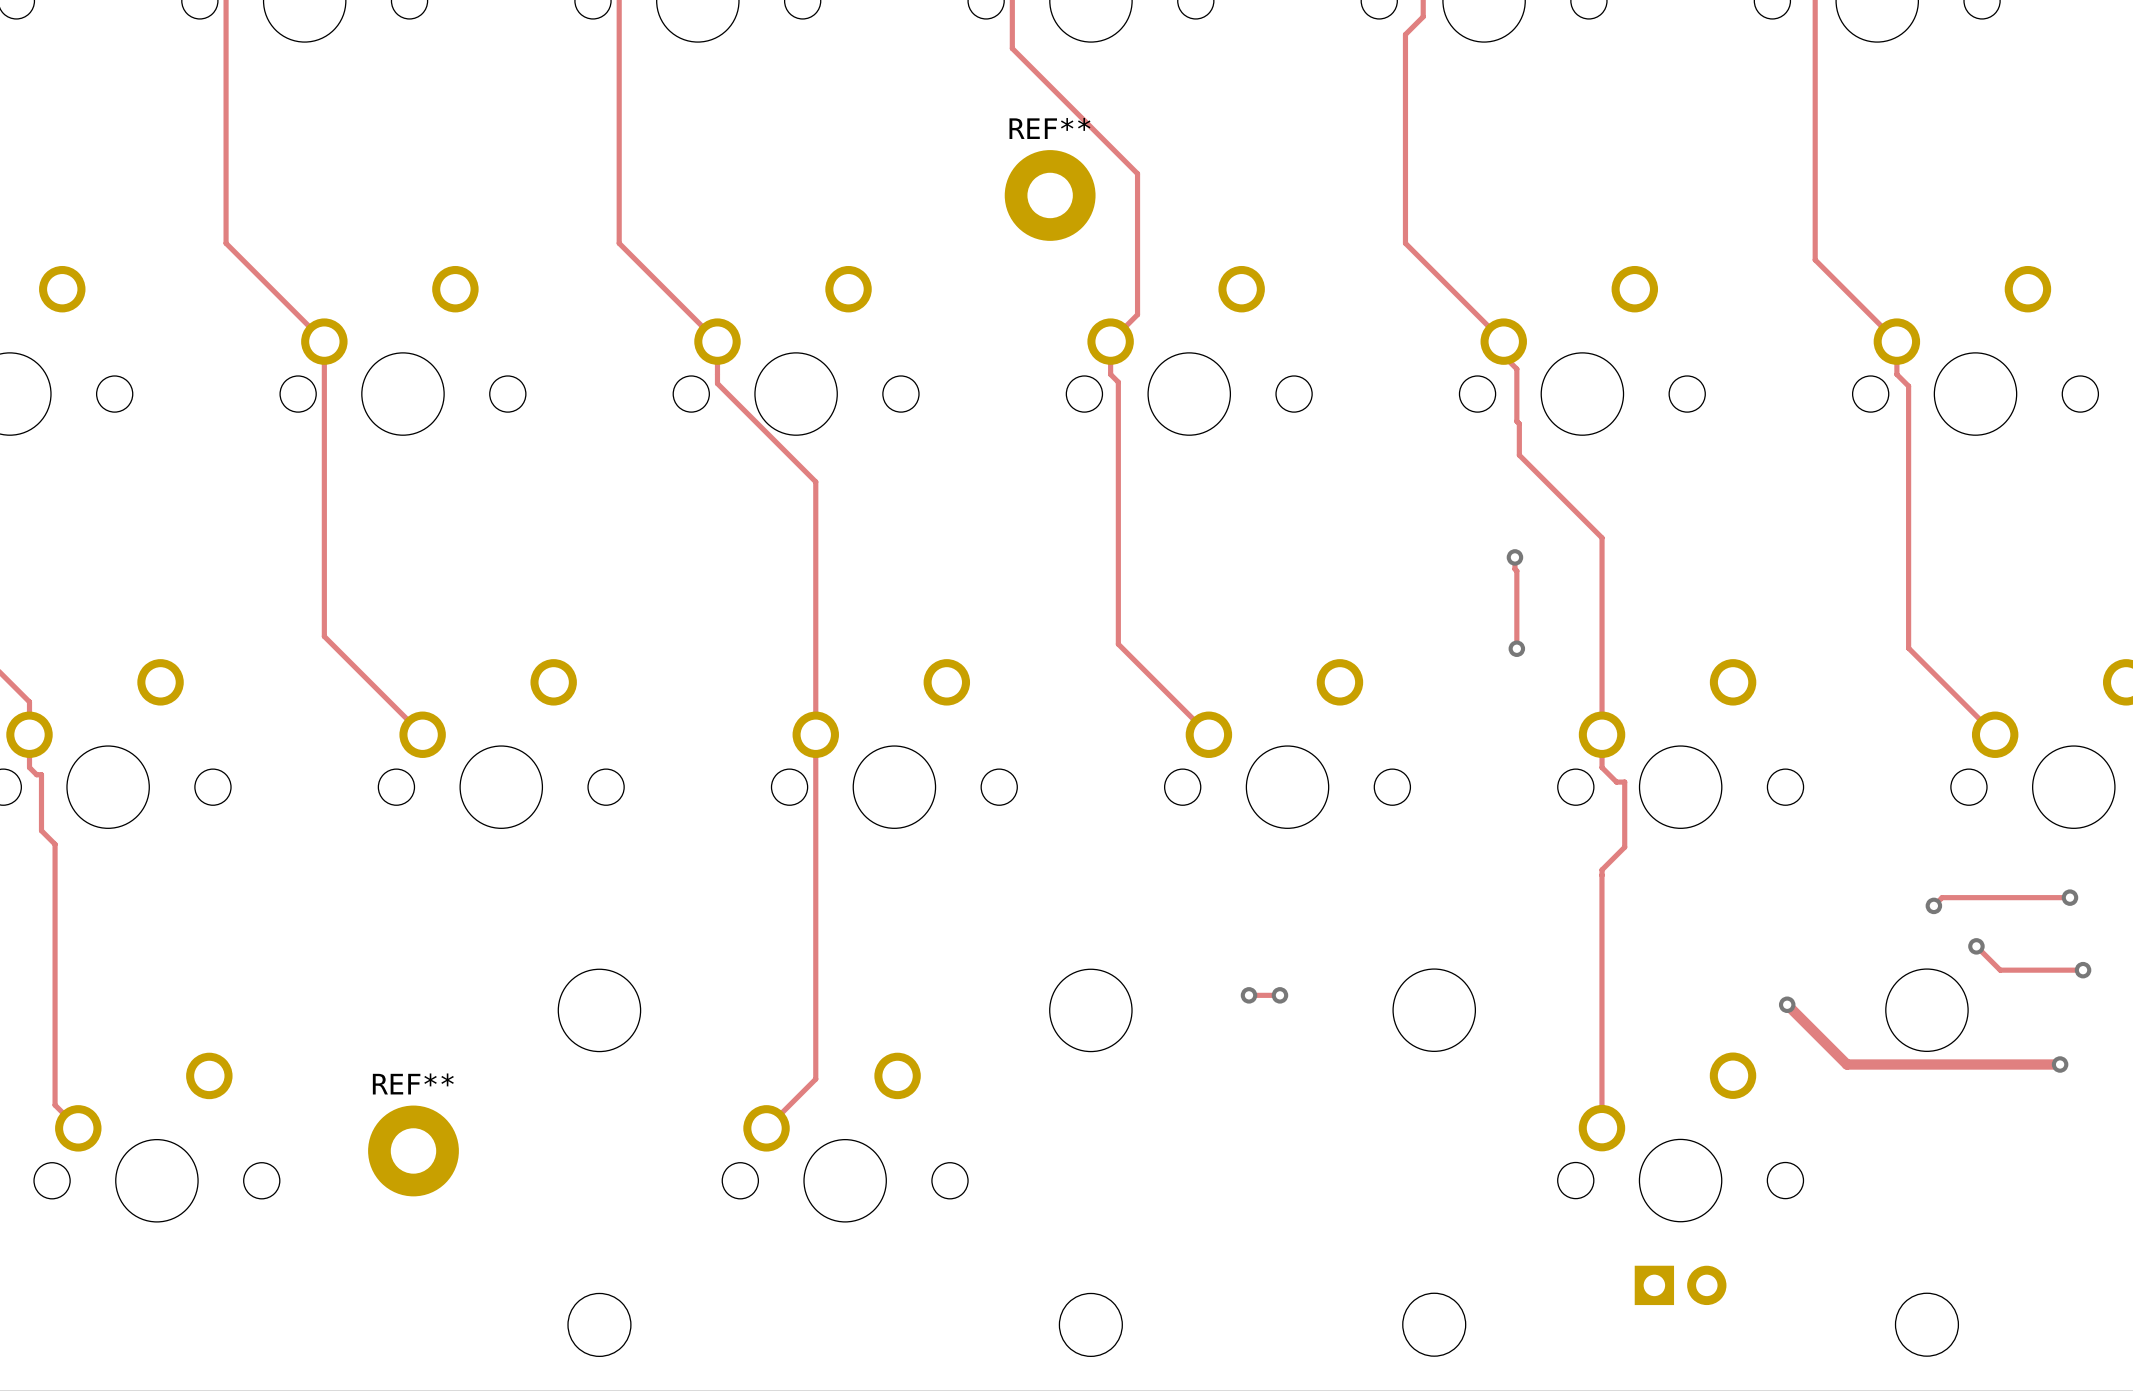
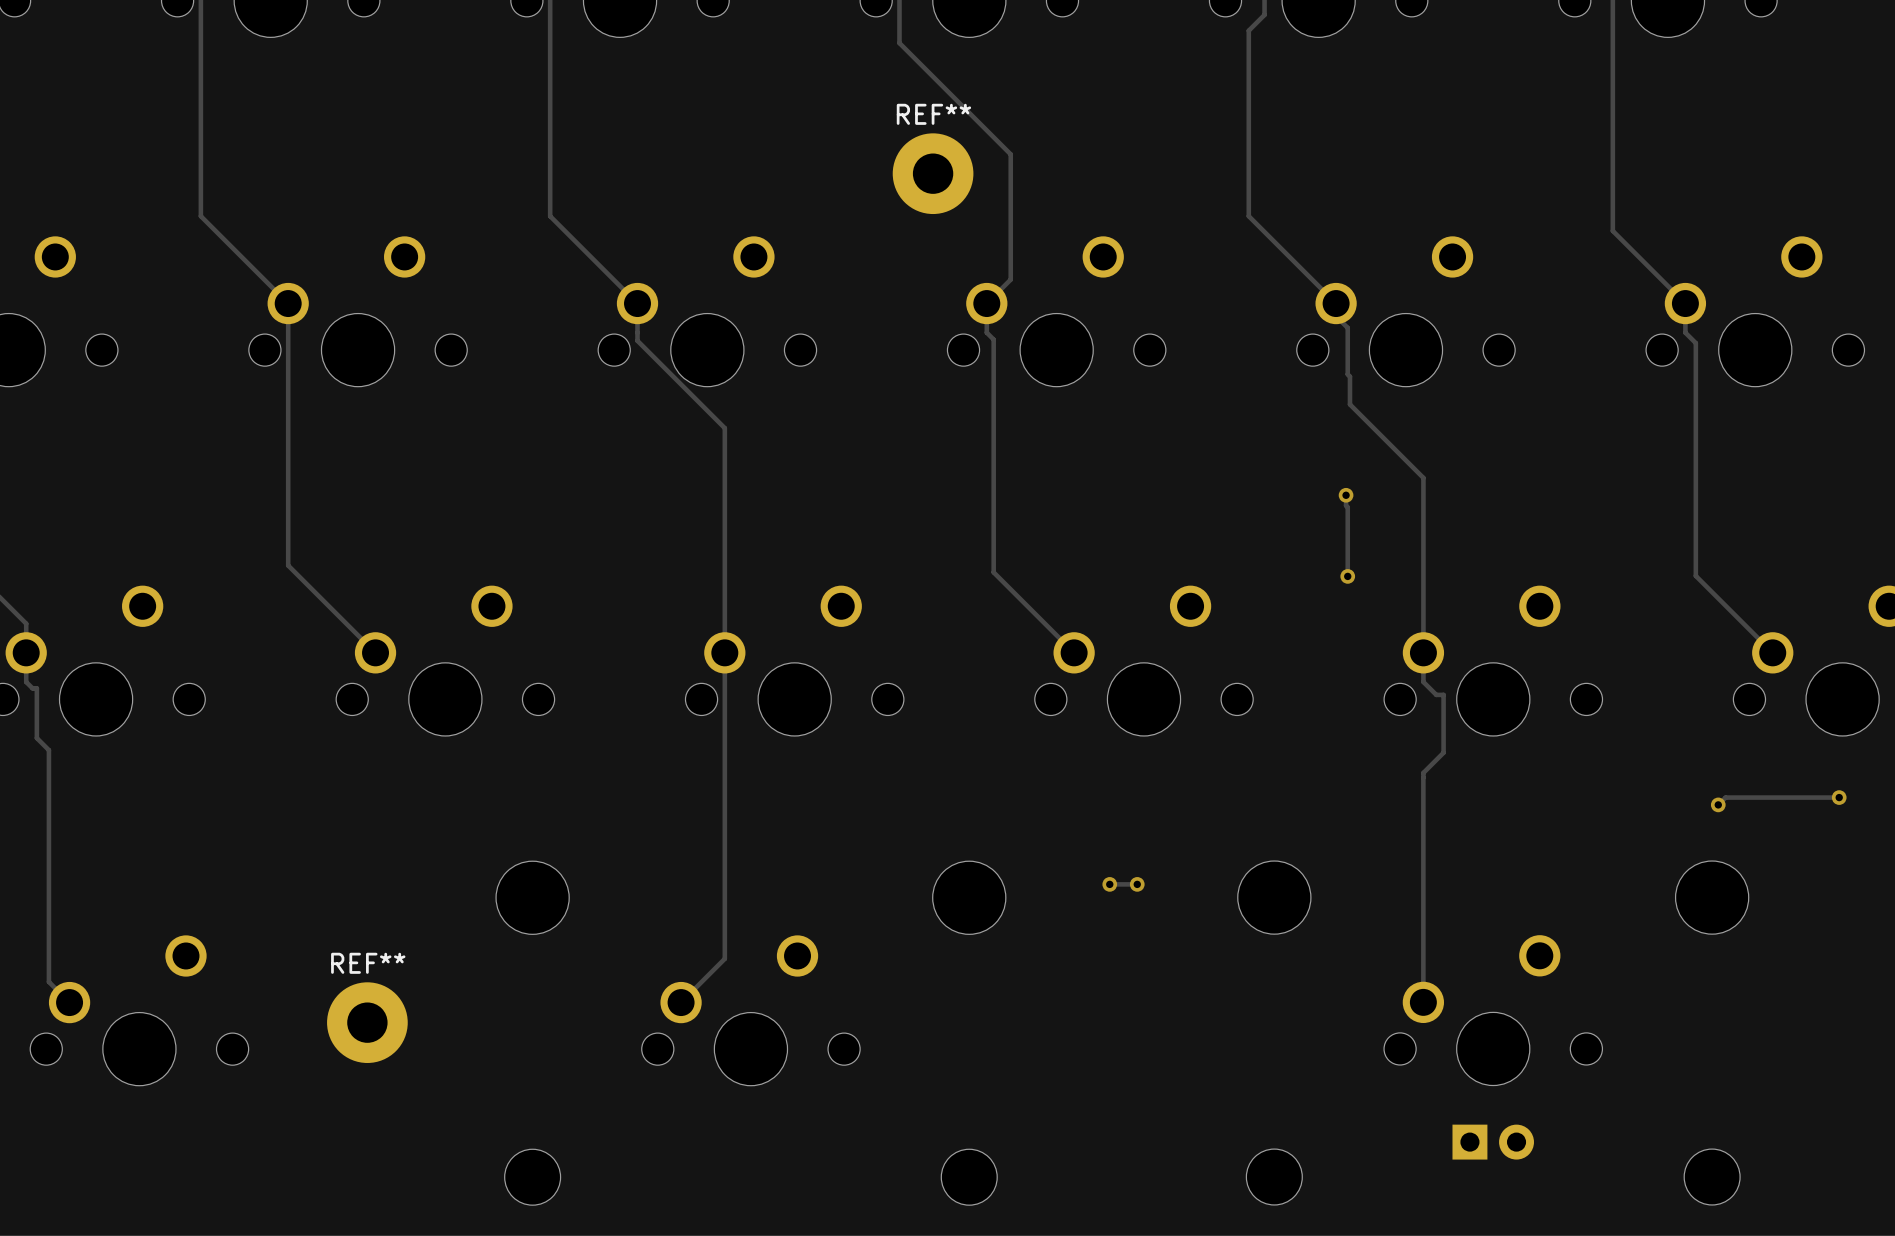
track: (1976, 946) (2000, 970) (2083, 970) -> none
via: (1976, 946) -> none
via: (2083, 970) -> none
track: (1787, 1004) (1846, 1064) (2060, 1064) -> none
via: (1787, 1004) -> none
via: (2060, 1064) -> none

